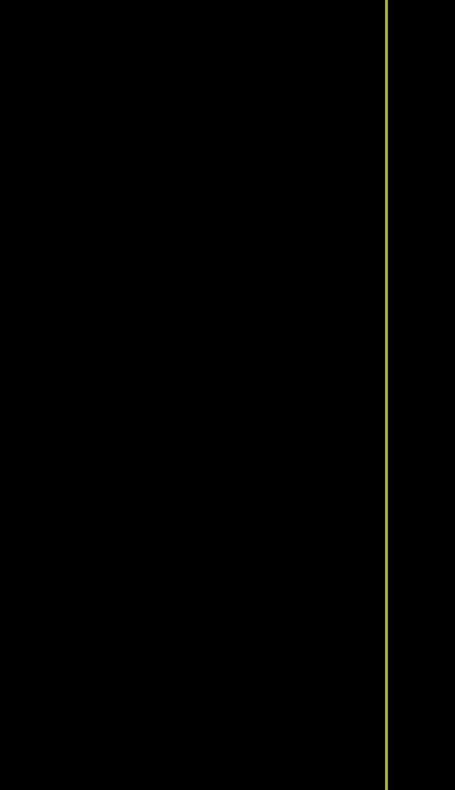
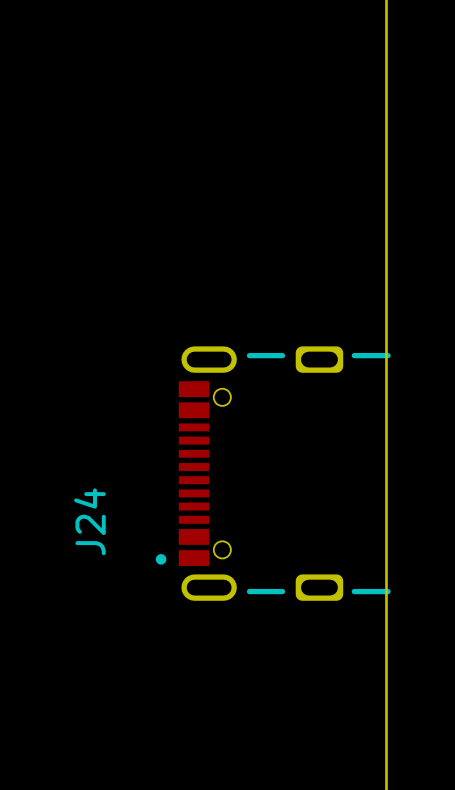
J24: none -> (273, 473)

